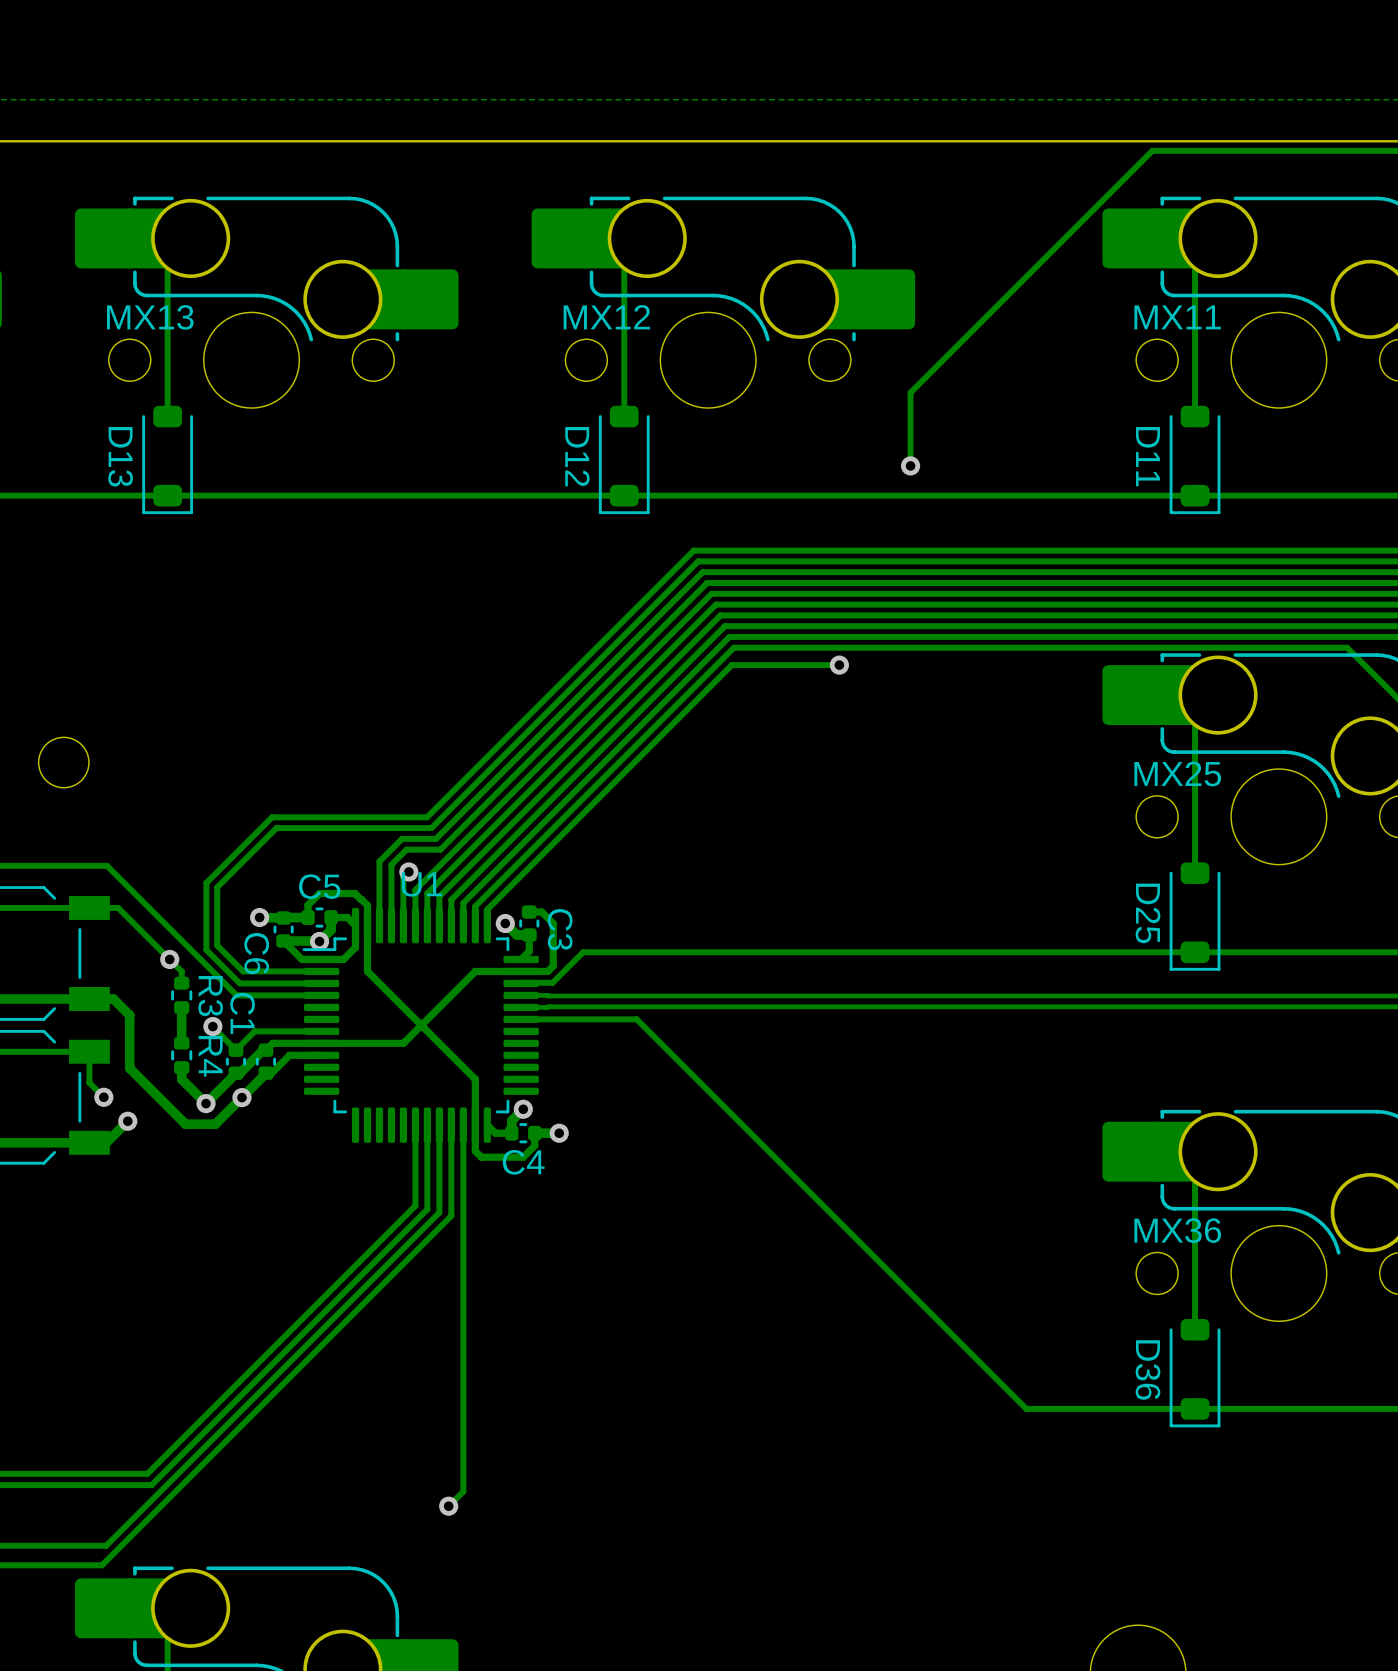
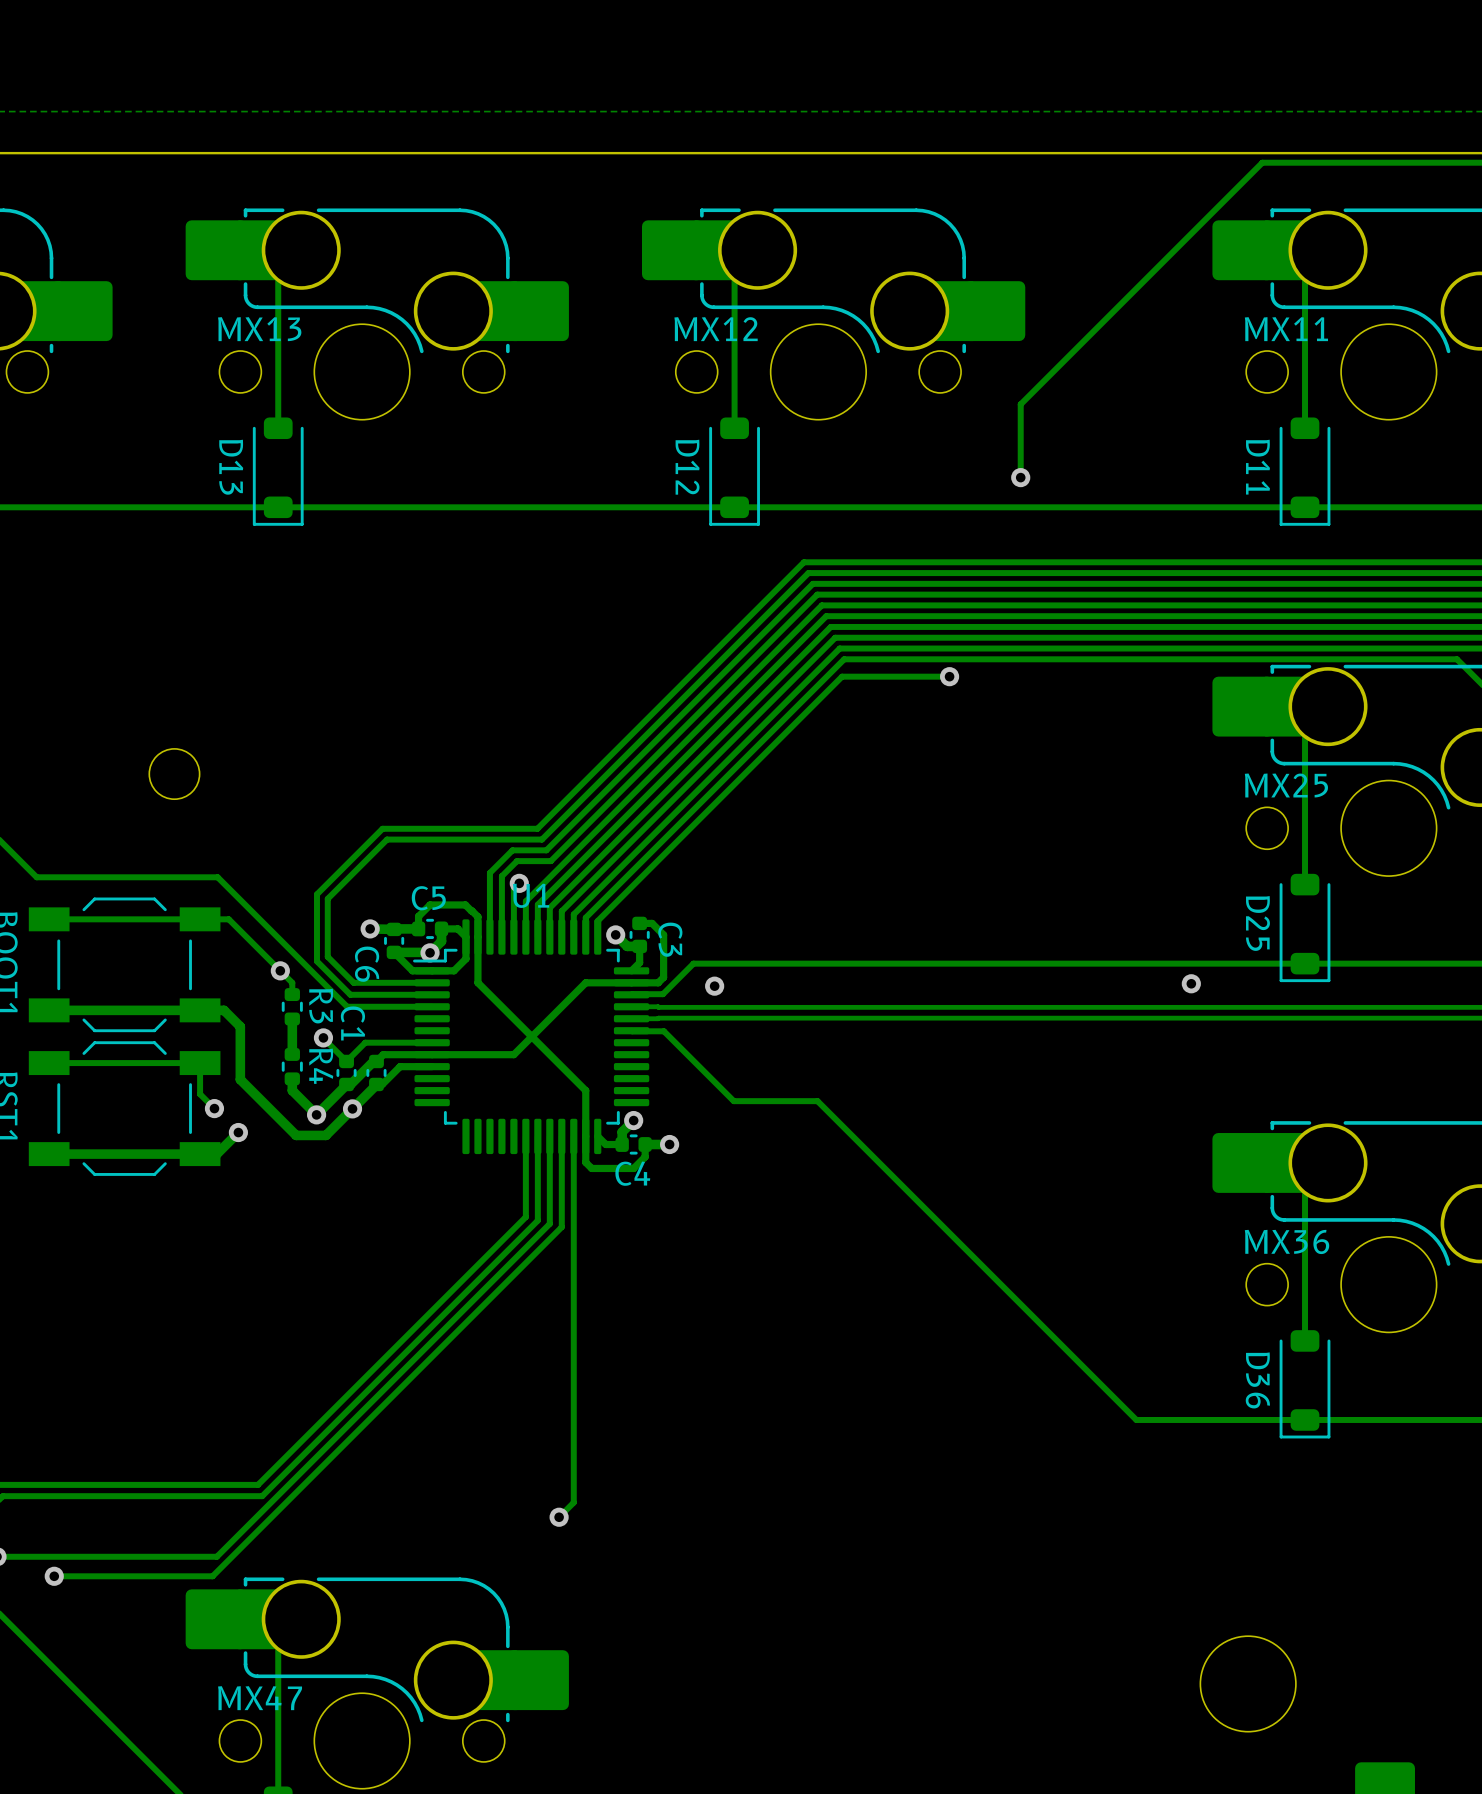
via: none -> (1191, 983)
via: none -> (714, 986)
track: (521, 1019) (636, 1019) (707, 1089) -> (631, 1030) (663, 1031) (733, 1101) (817, 1101)

